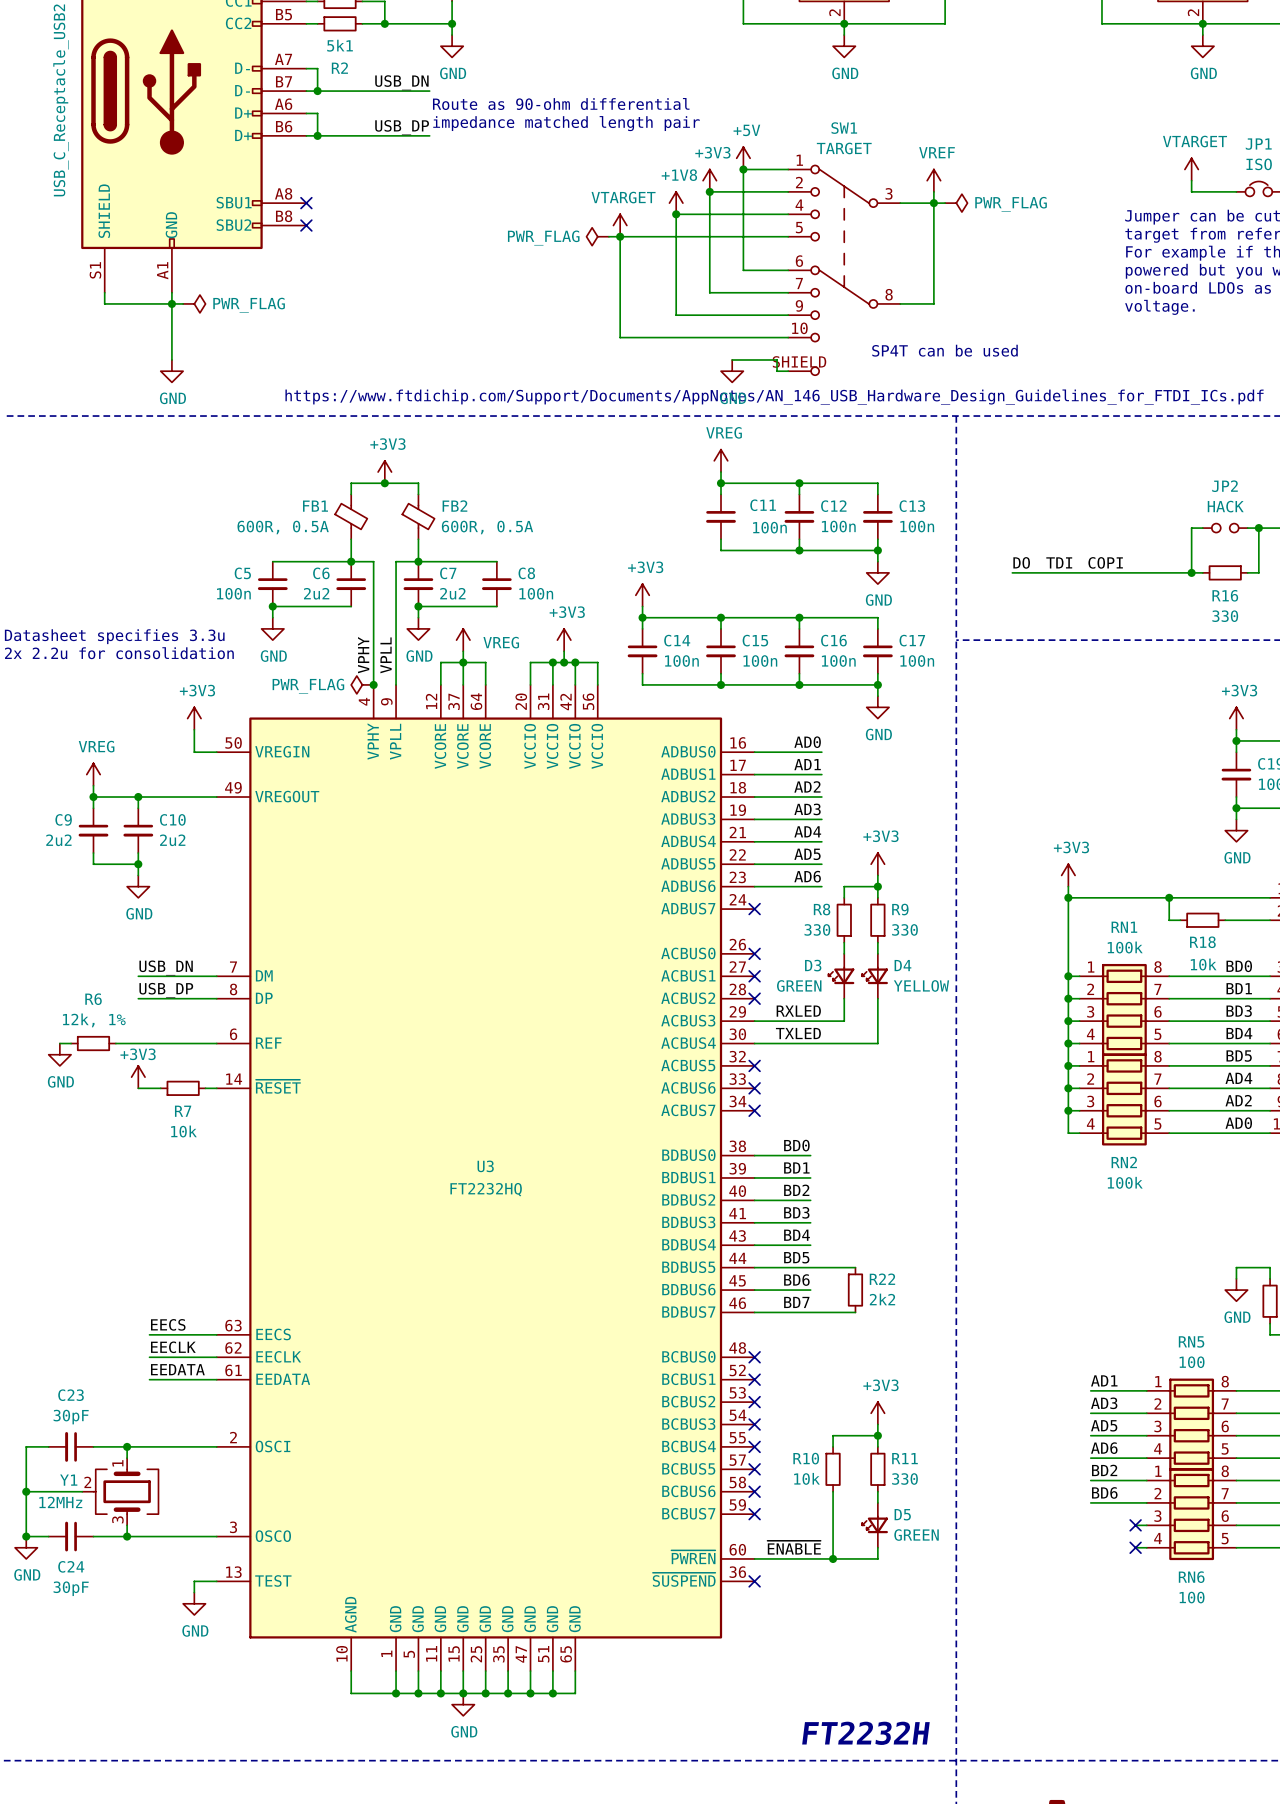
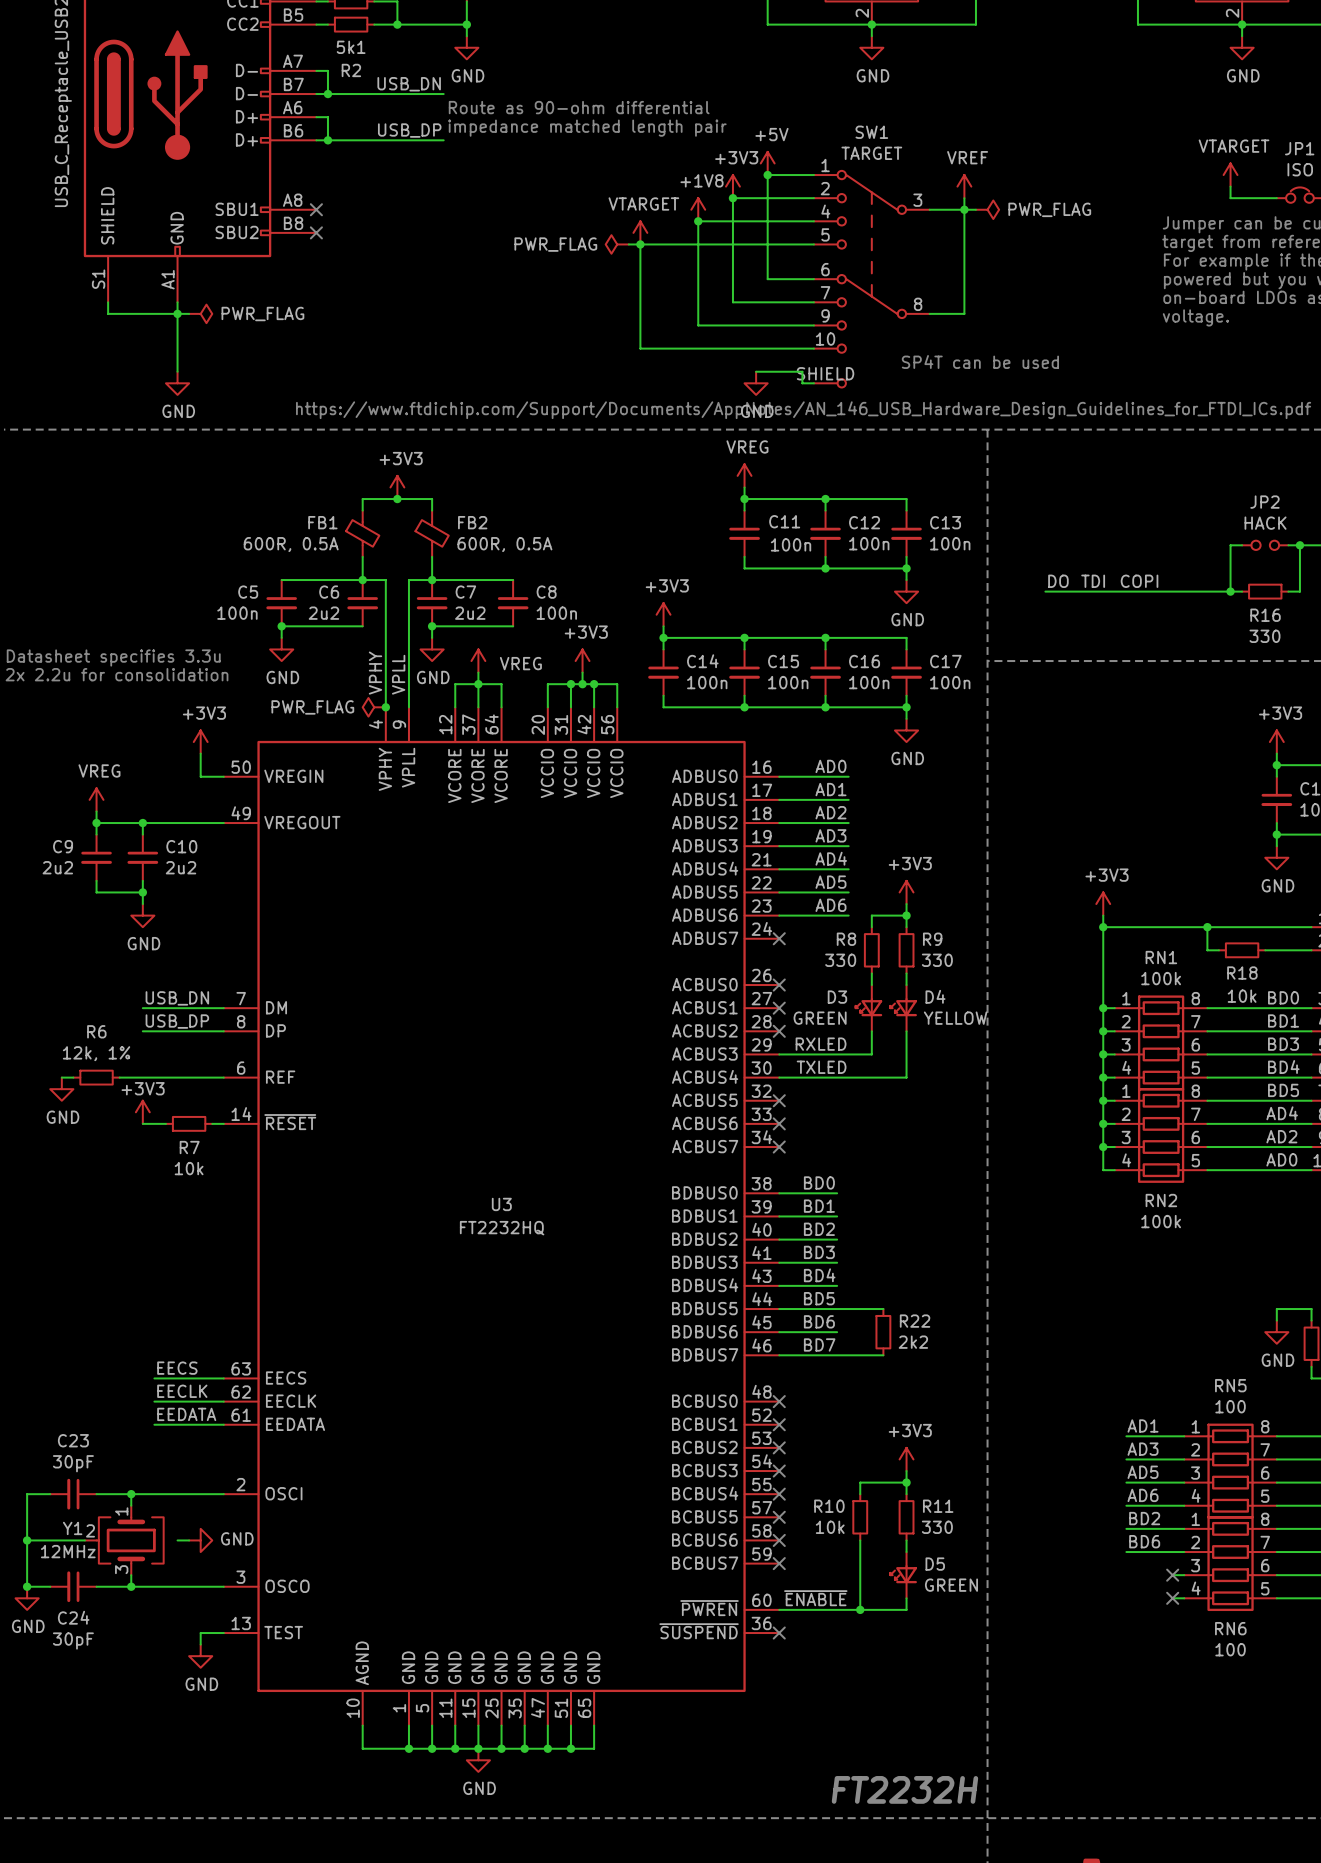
wire: none -> (177, 1540) (189, 1540)
power symbol: none -> GND (200, 1540)

